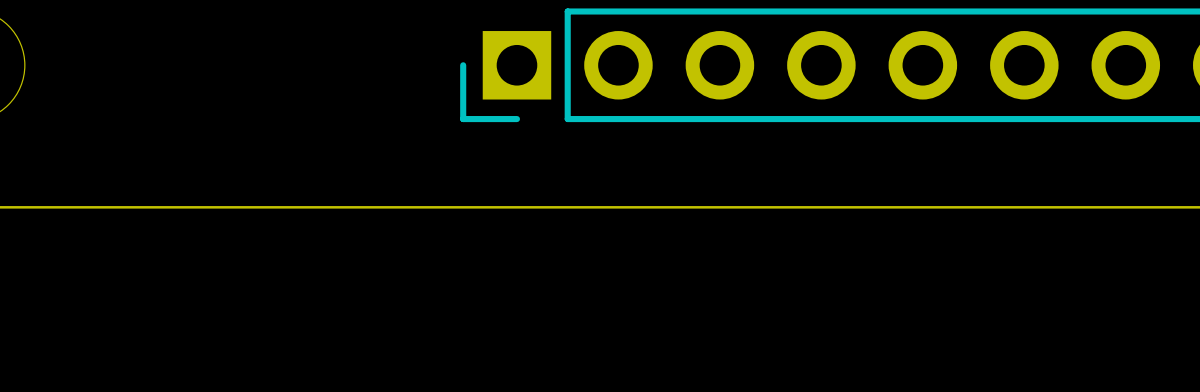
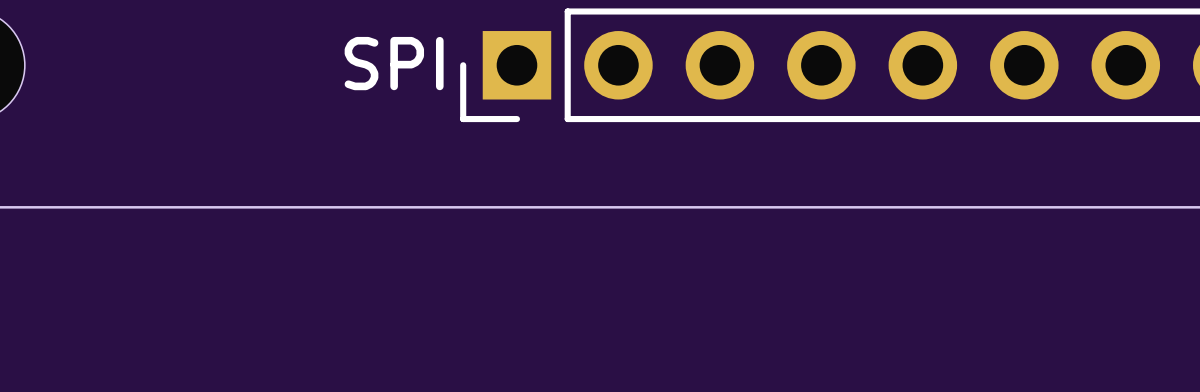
text: none -> SPI (394, 63)

